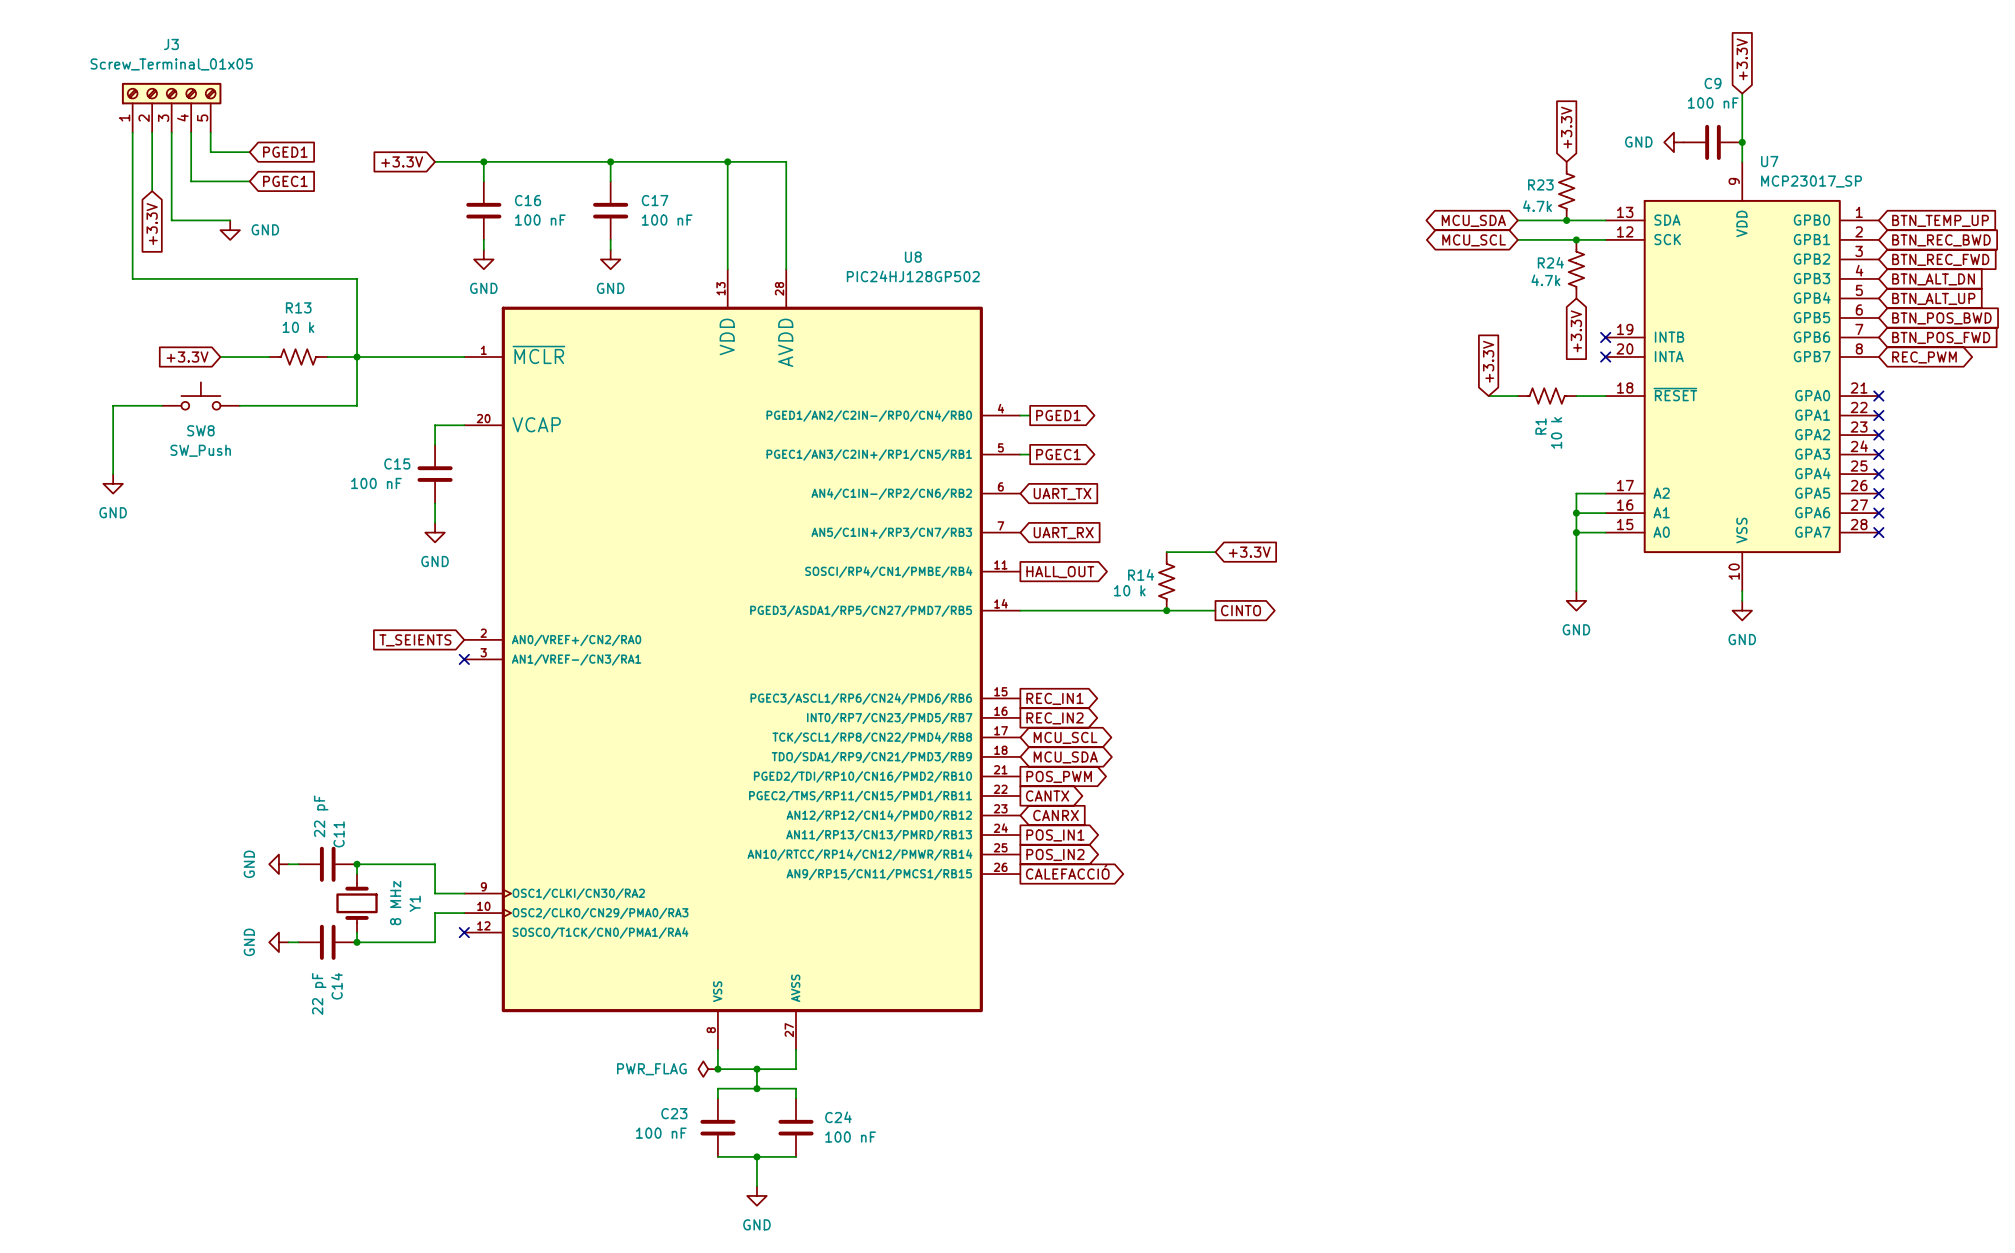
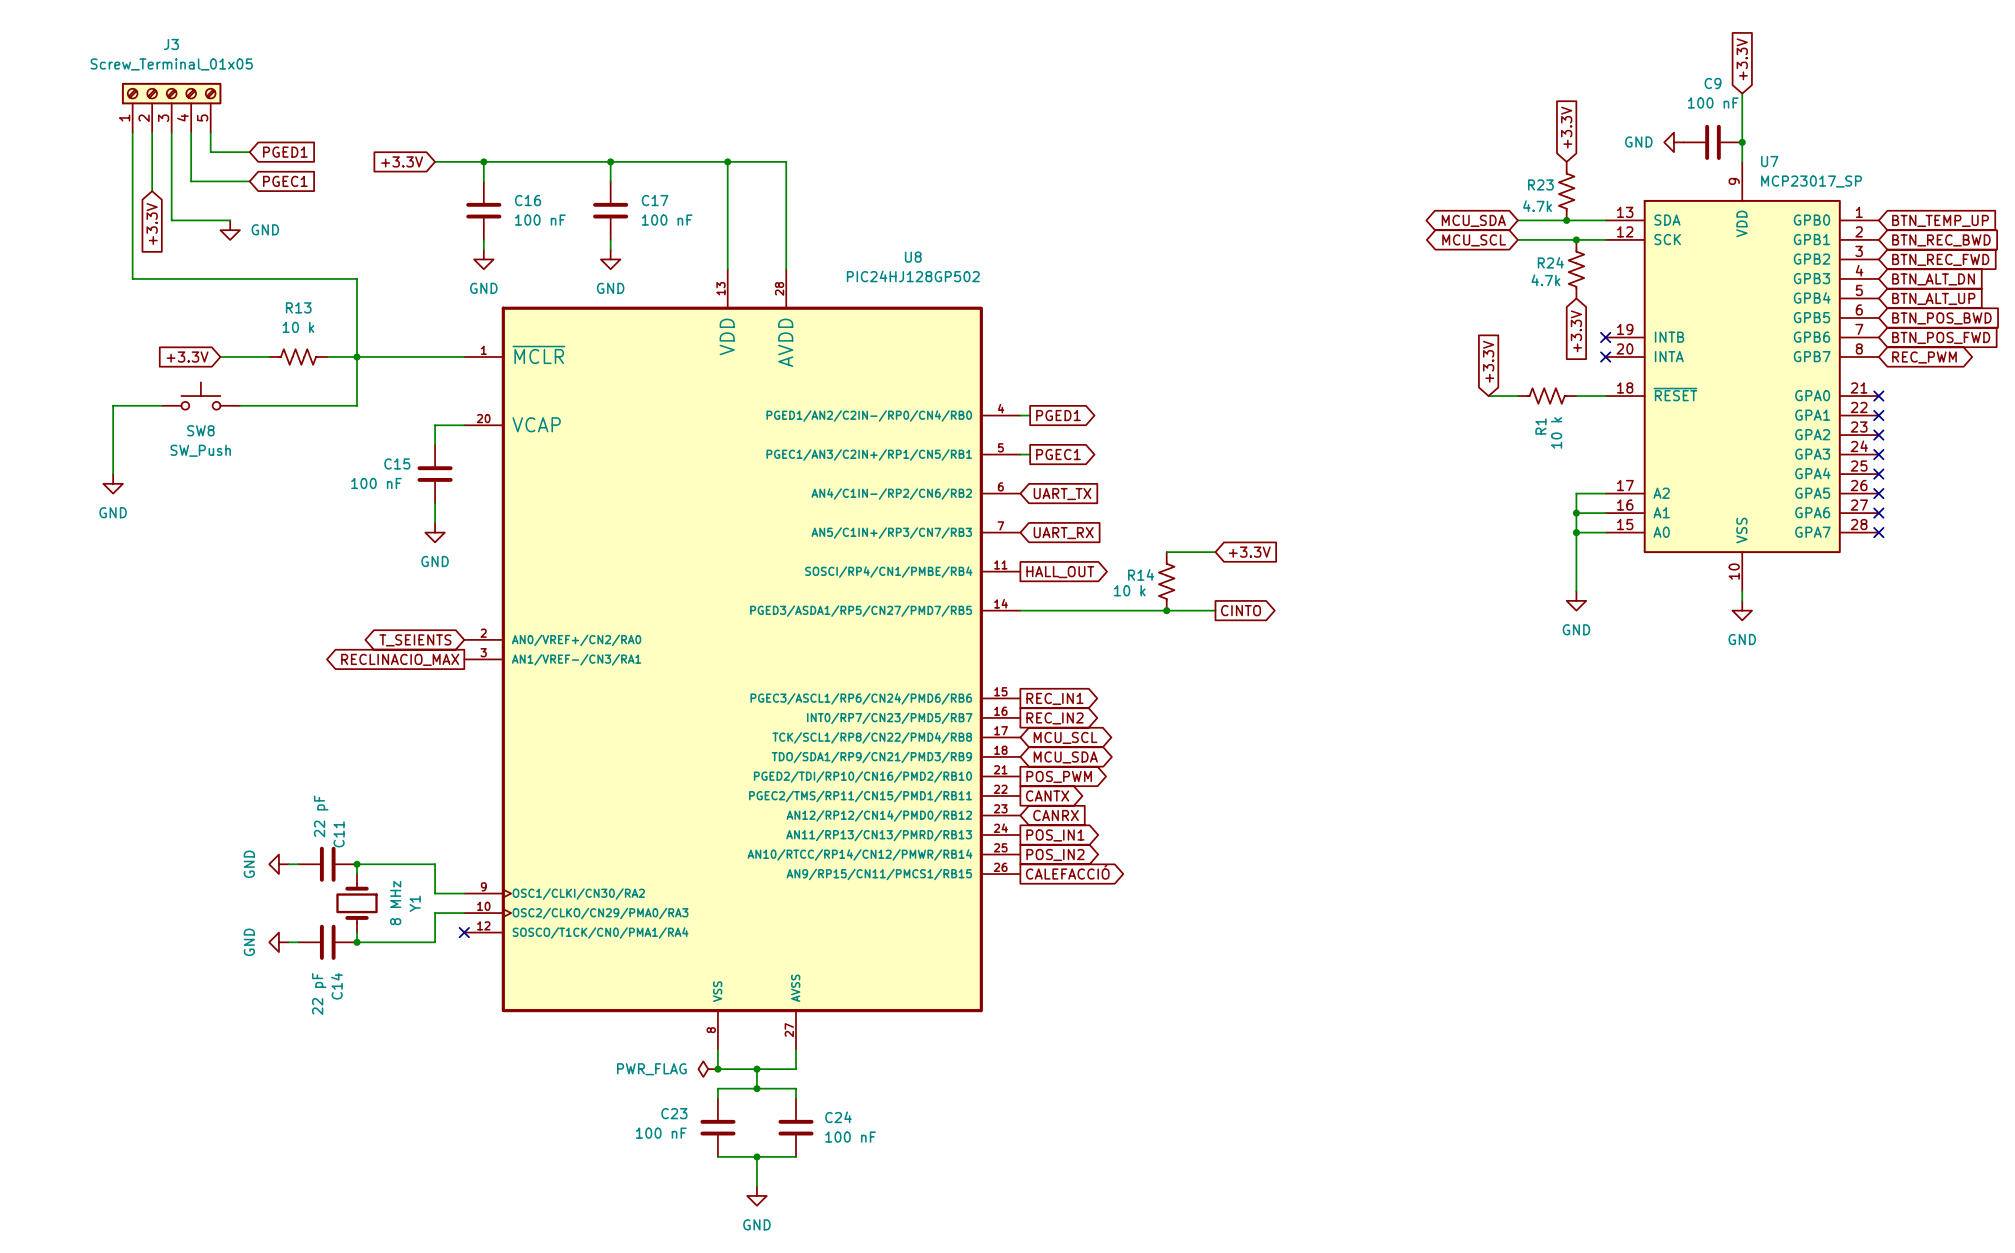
global label shape: input (415, 640) -> bidirectional (415, 640)
global label: none -> RECLINACIO_MAX (400, 659)
no-connect mark: (464, 659) -> none

